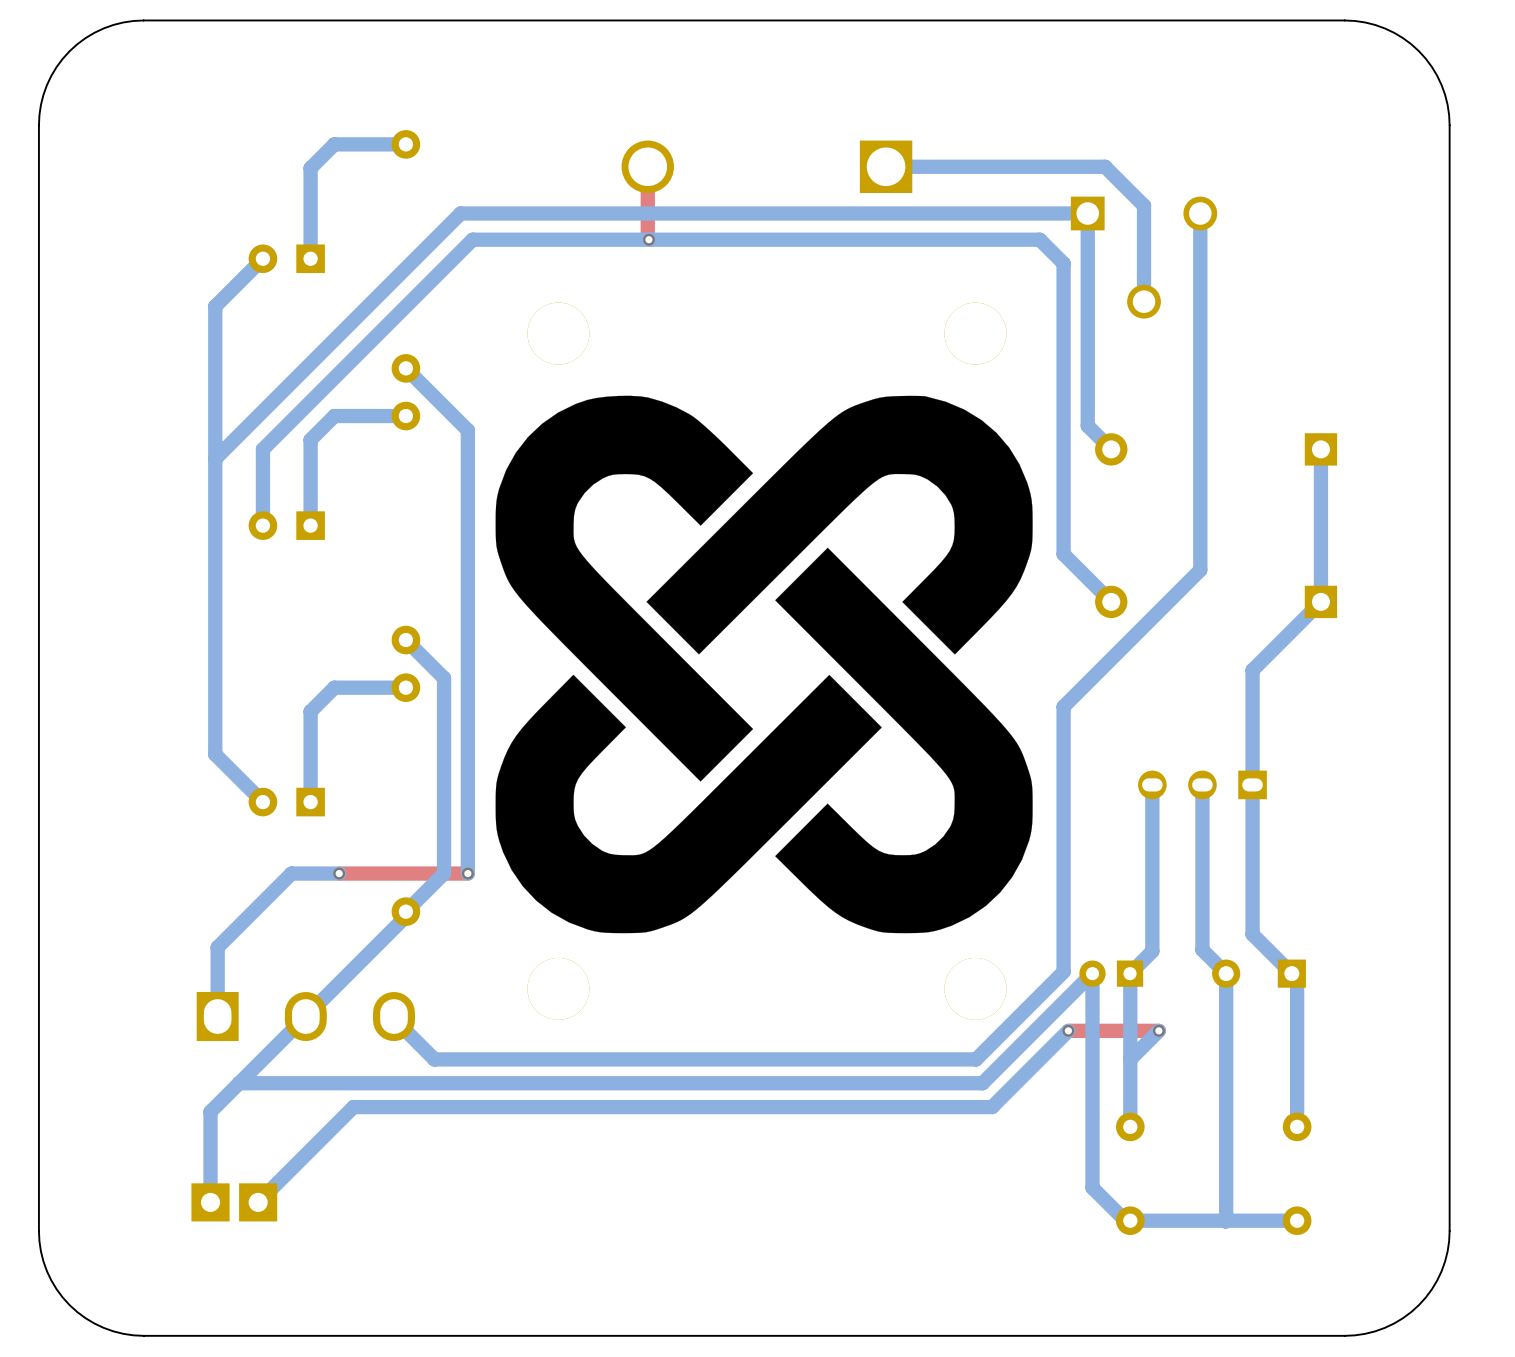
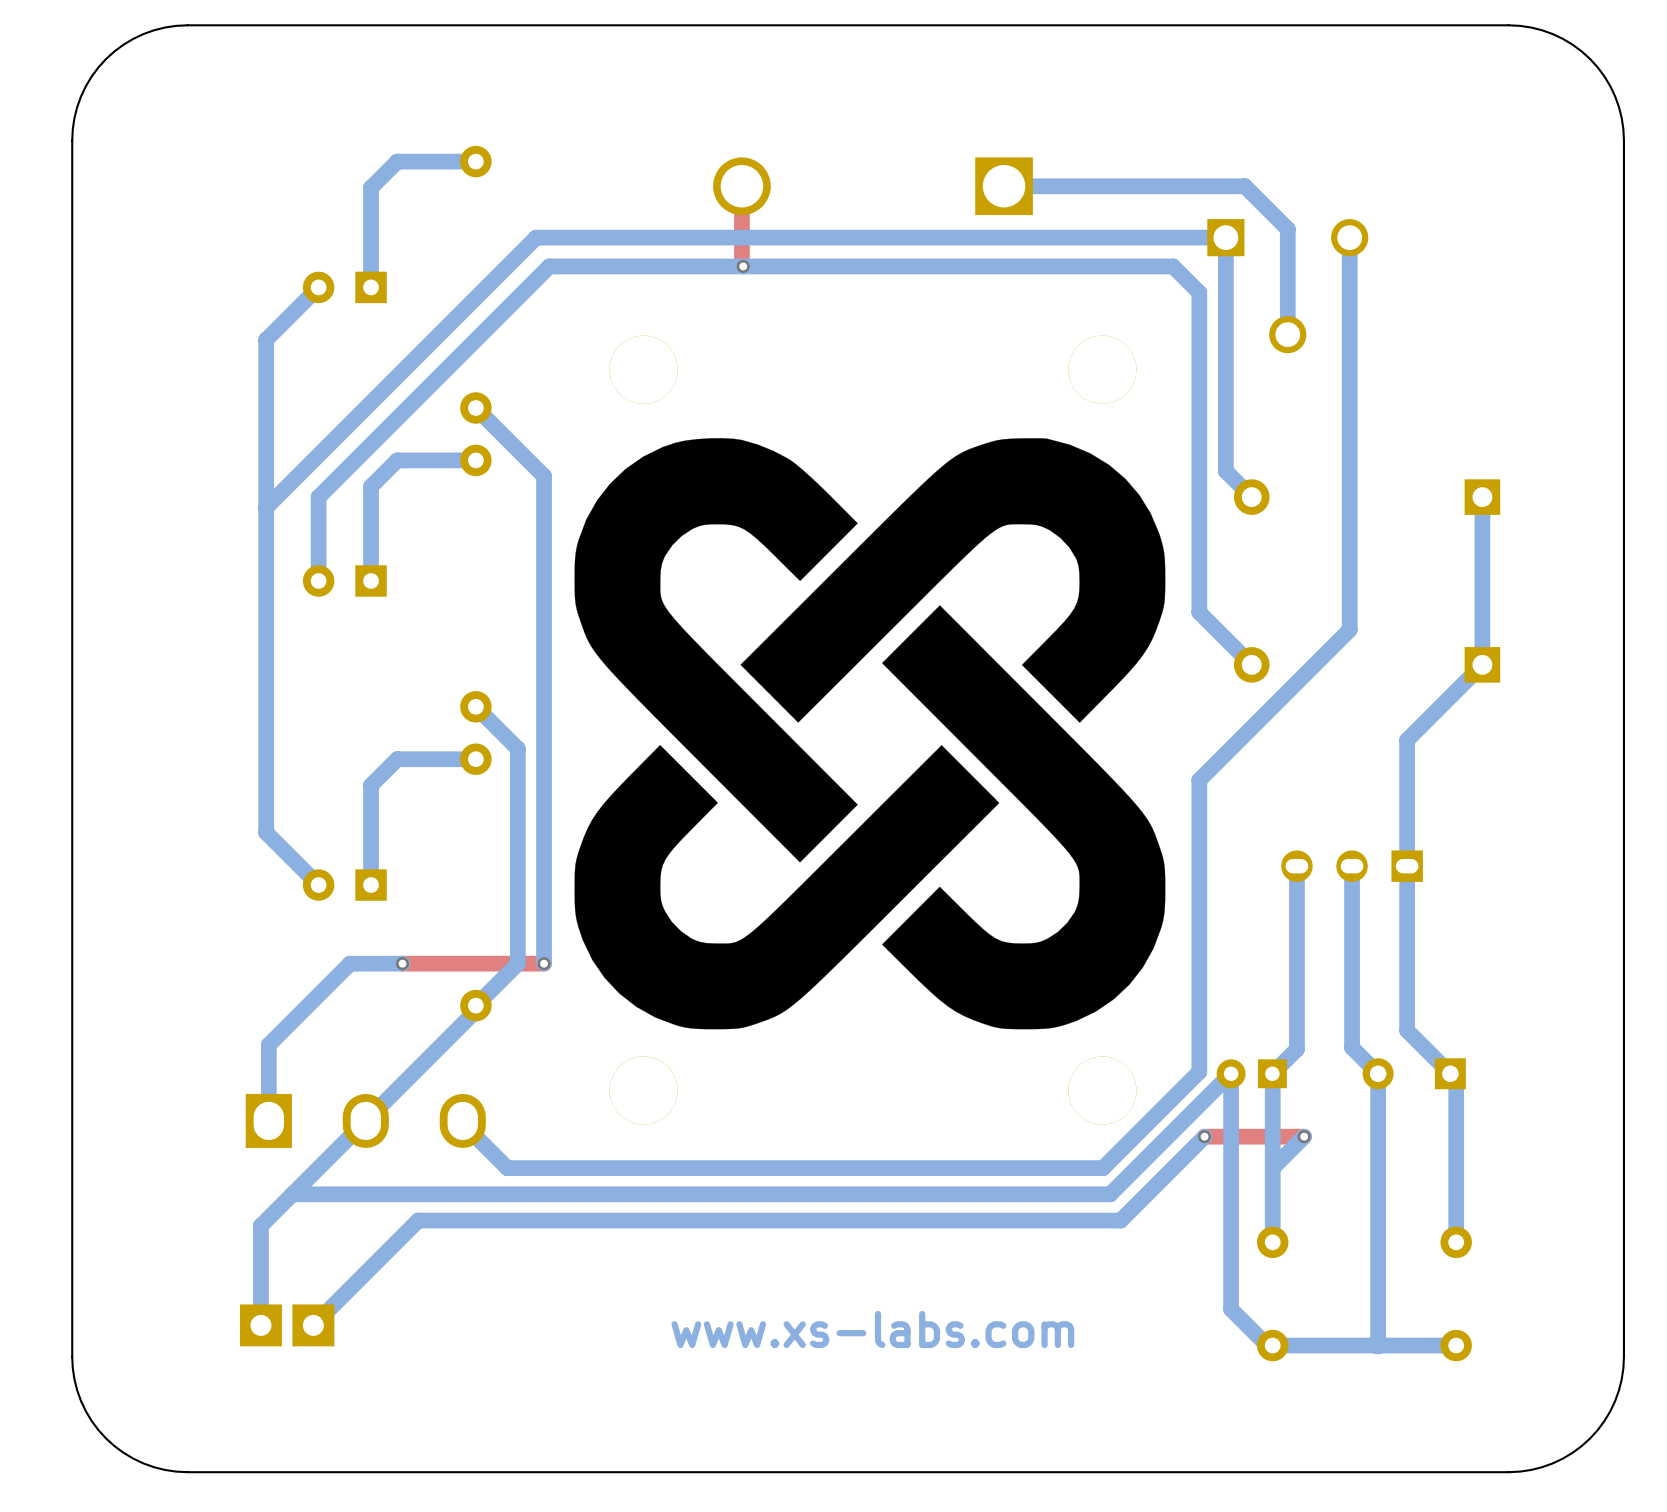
text: none -> www.xs-labs.com (872, 1329)

